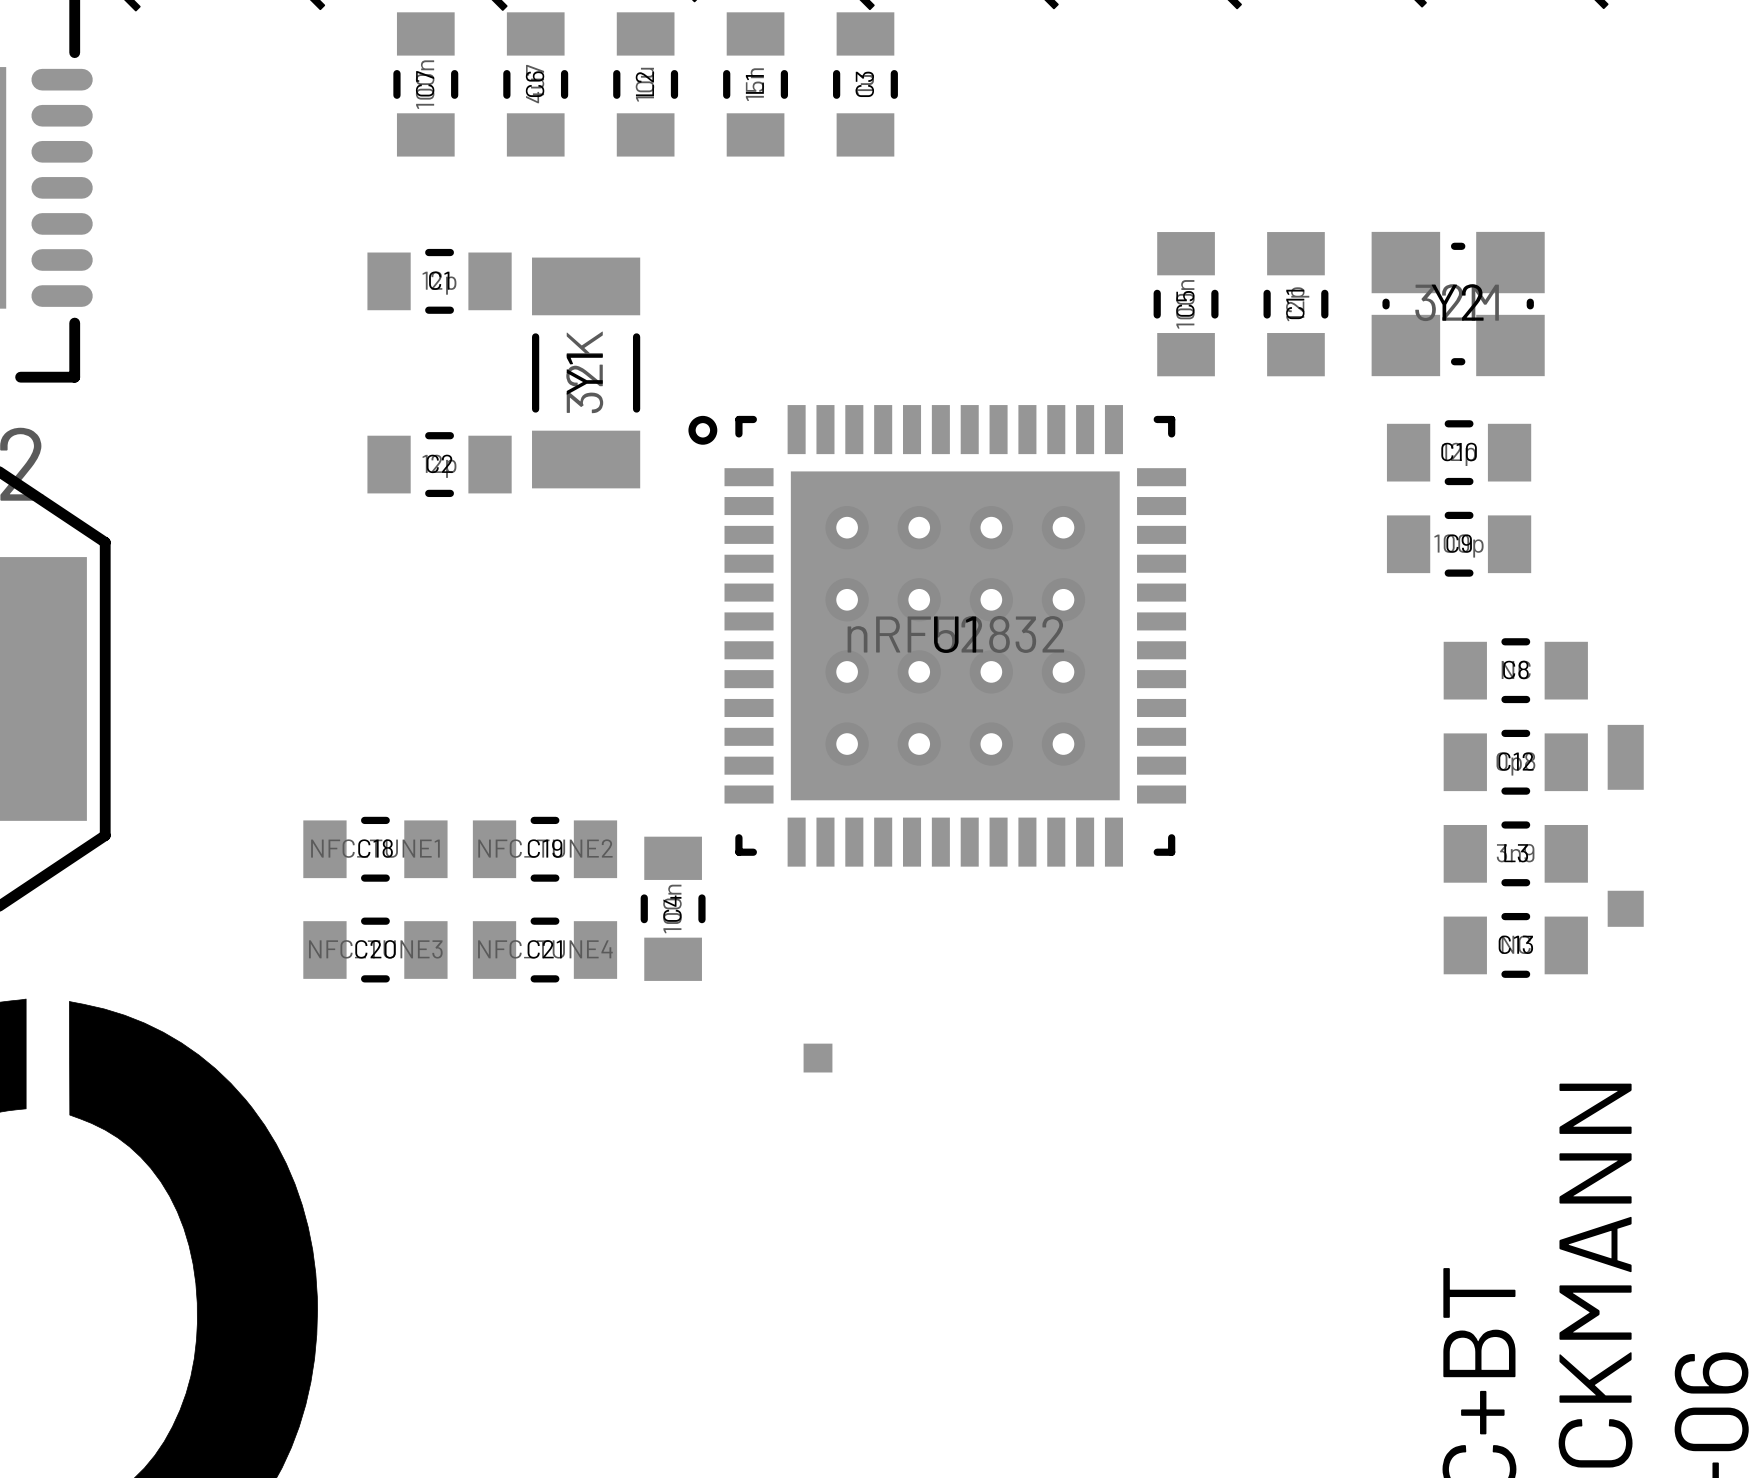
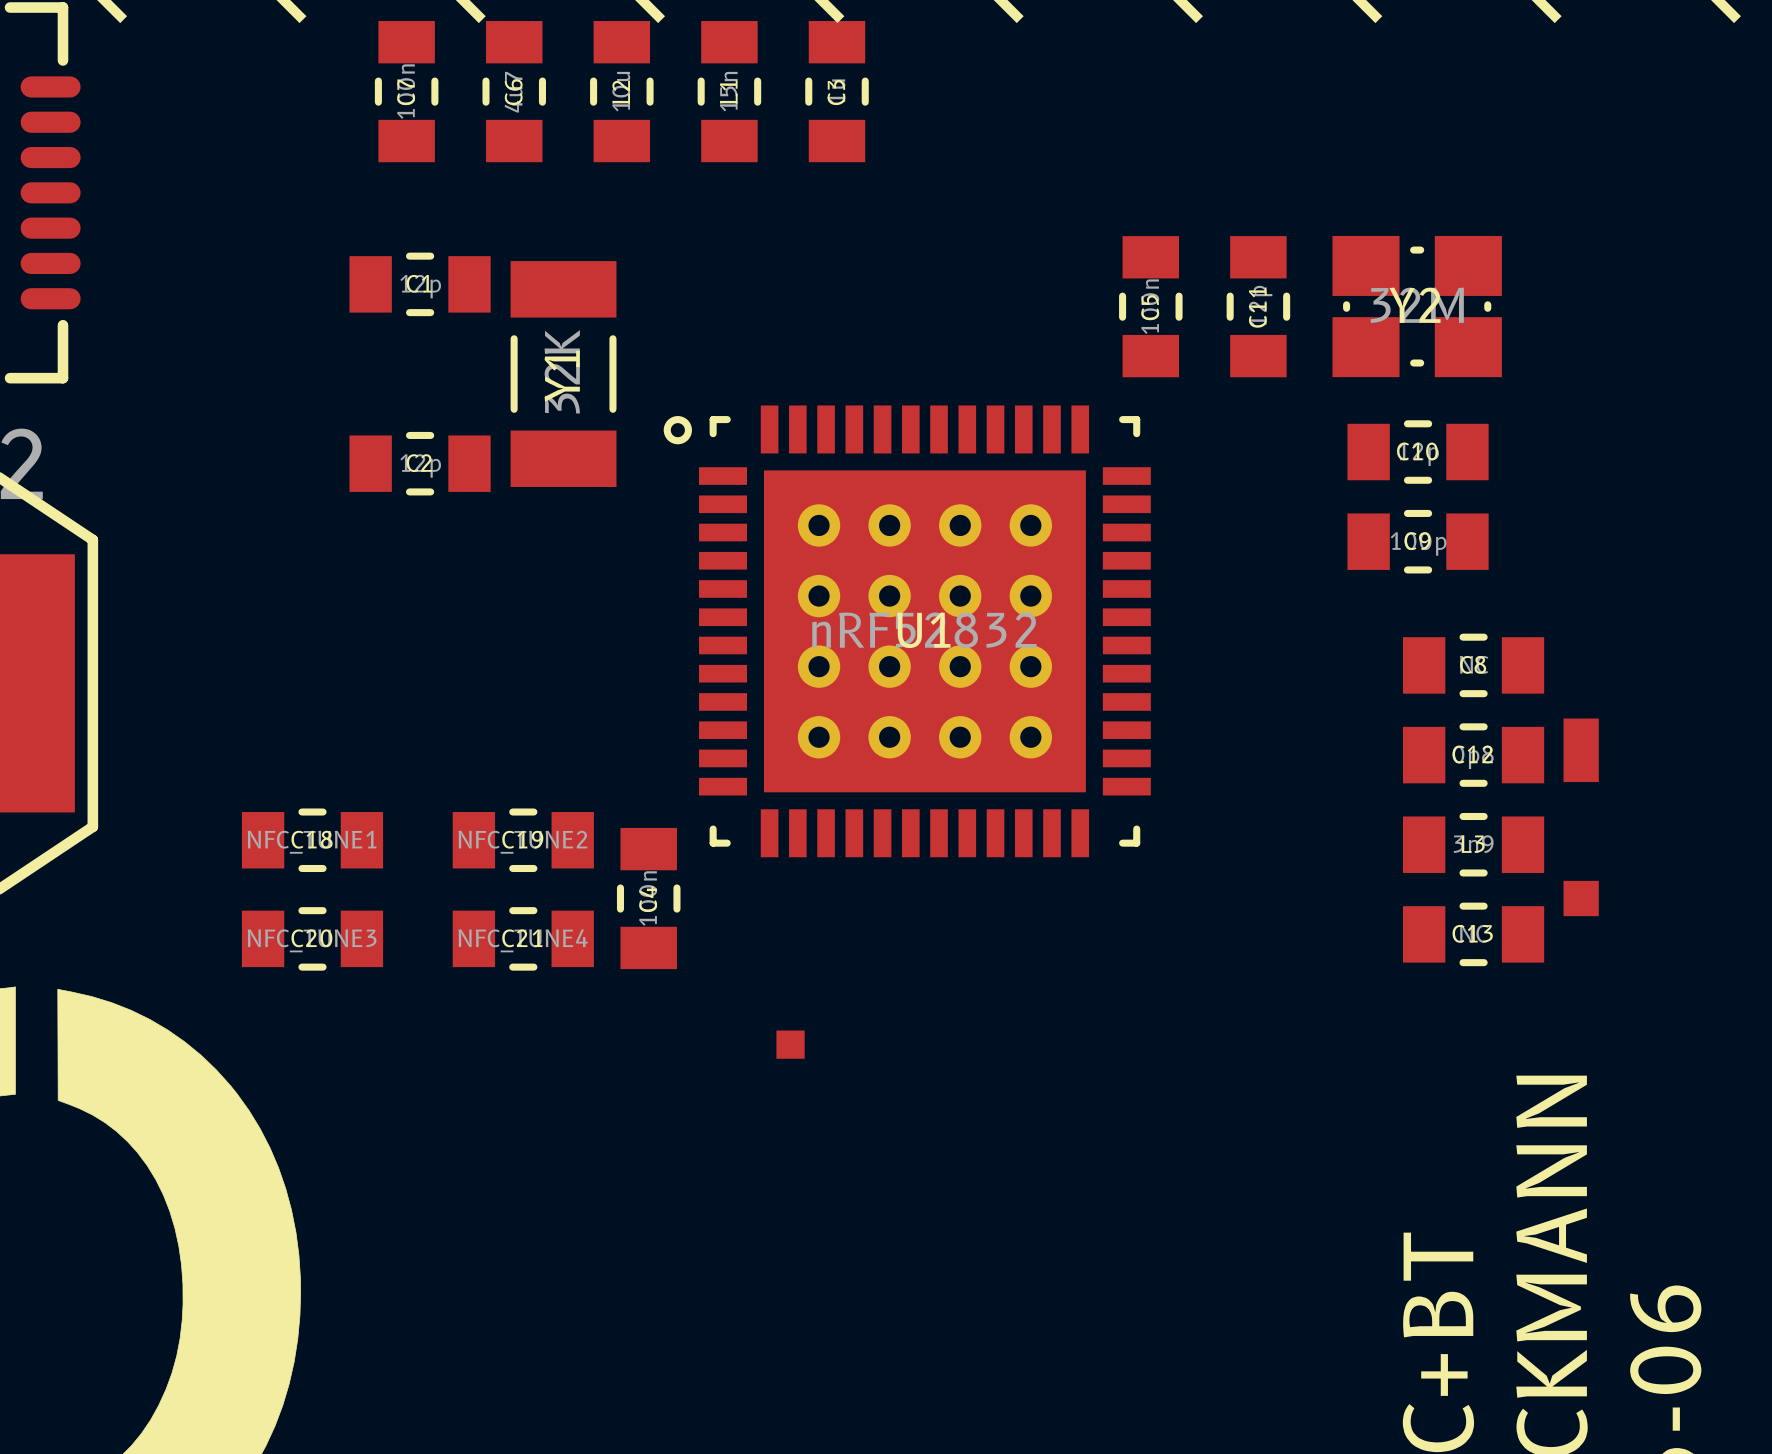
C18 position: (375, 849) -> (312, 840)
C20 position: (375, 950) -> (312, 938)

